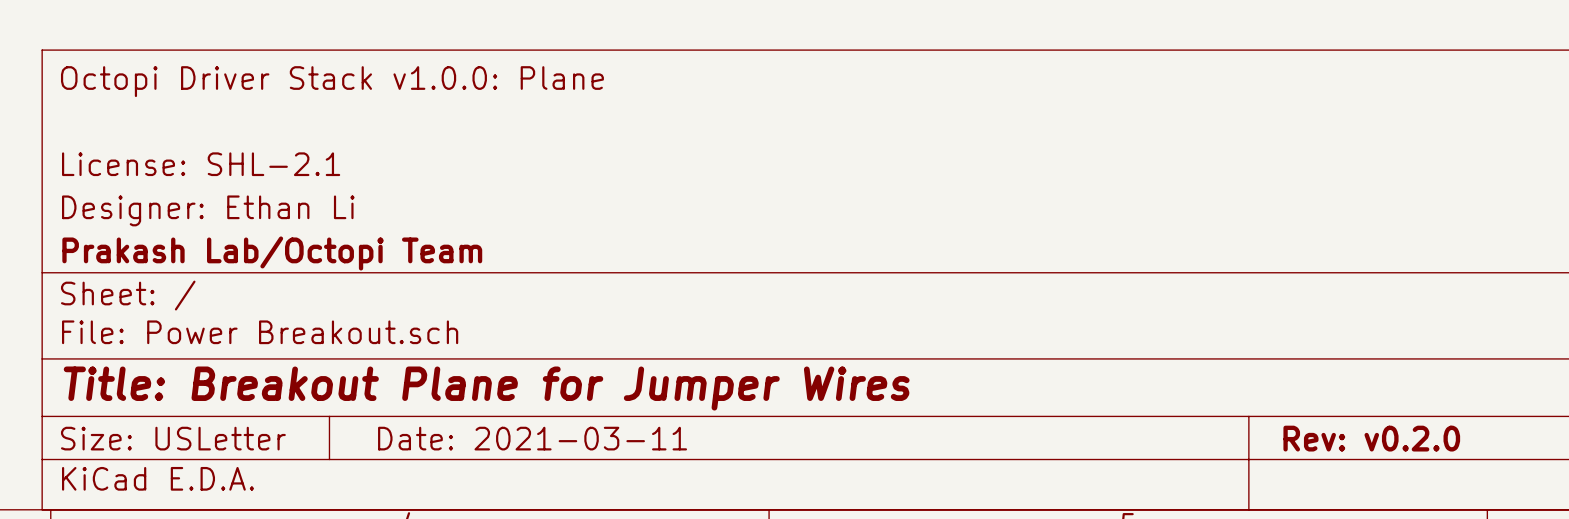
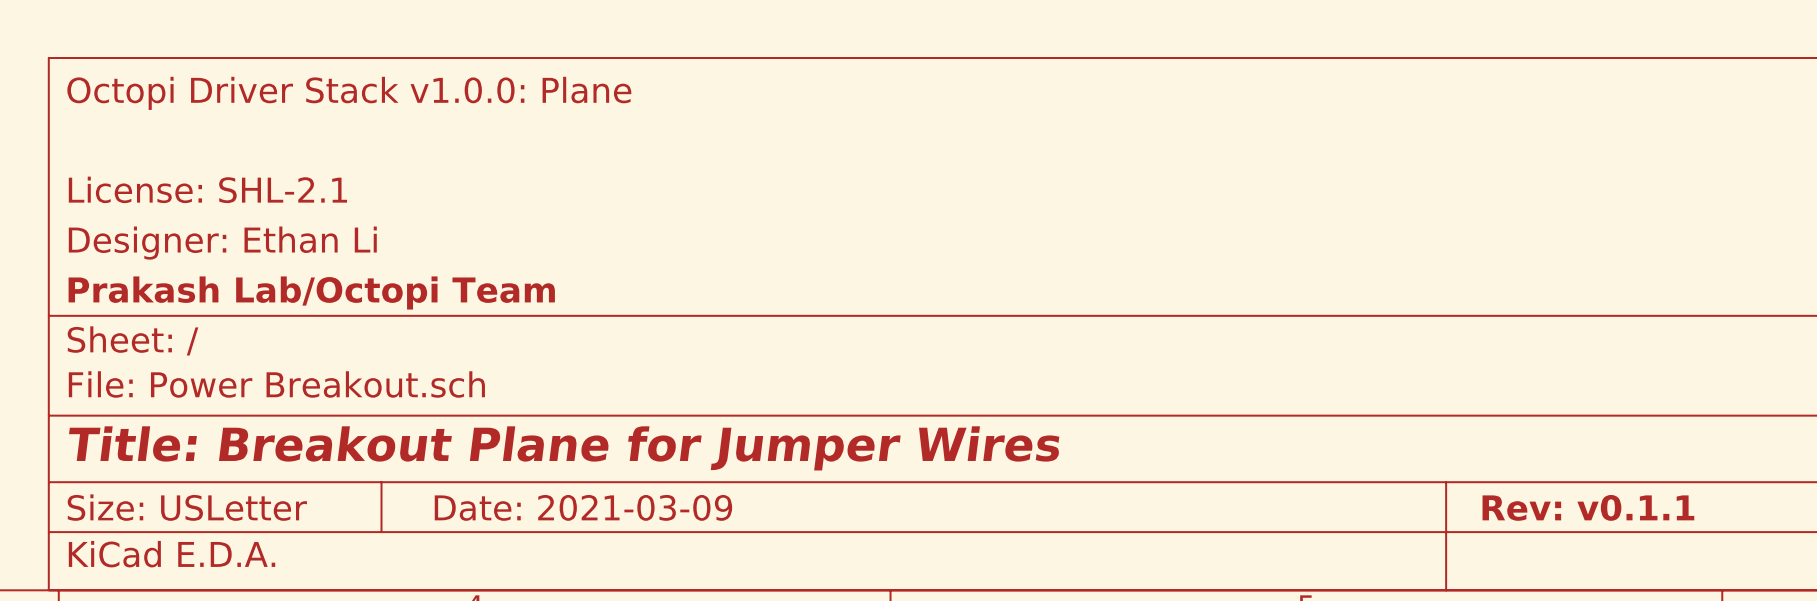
title block: Date: 2021-03-11 (532, 438) -> Date: 2021-03-09 (583, 507)
title block: Rev: v0.2.0 (1371, 438) -> Rev: v0.1.1 (1588, 507)

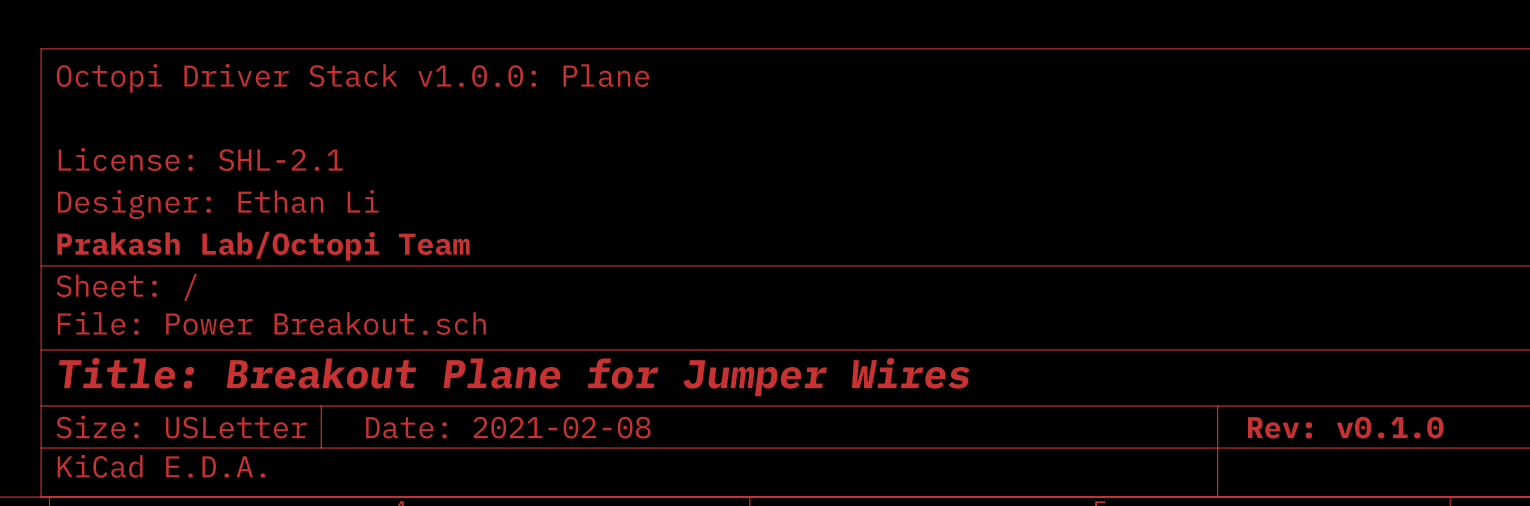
title block: Date: 2021-03-09 (583, 507) -> Date: 2021-02-08 (508, 427)
title block: Rev: v0.1.1 (1588, 507) -> Rev: v0.1.0 (1345, 427)

